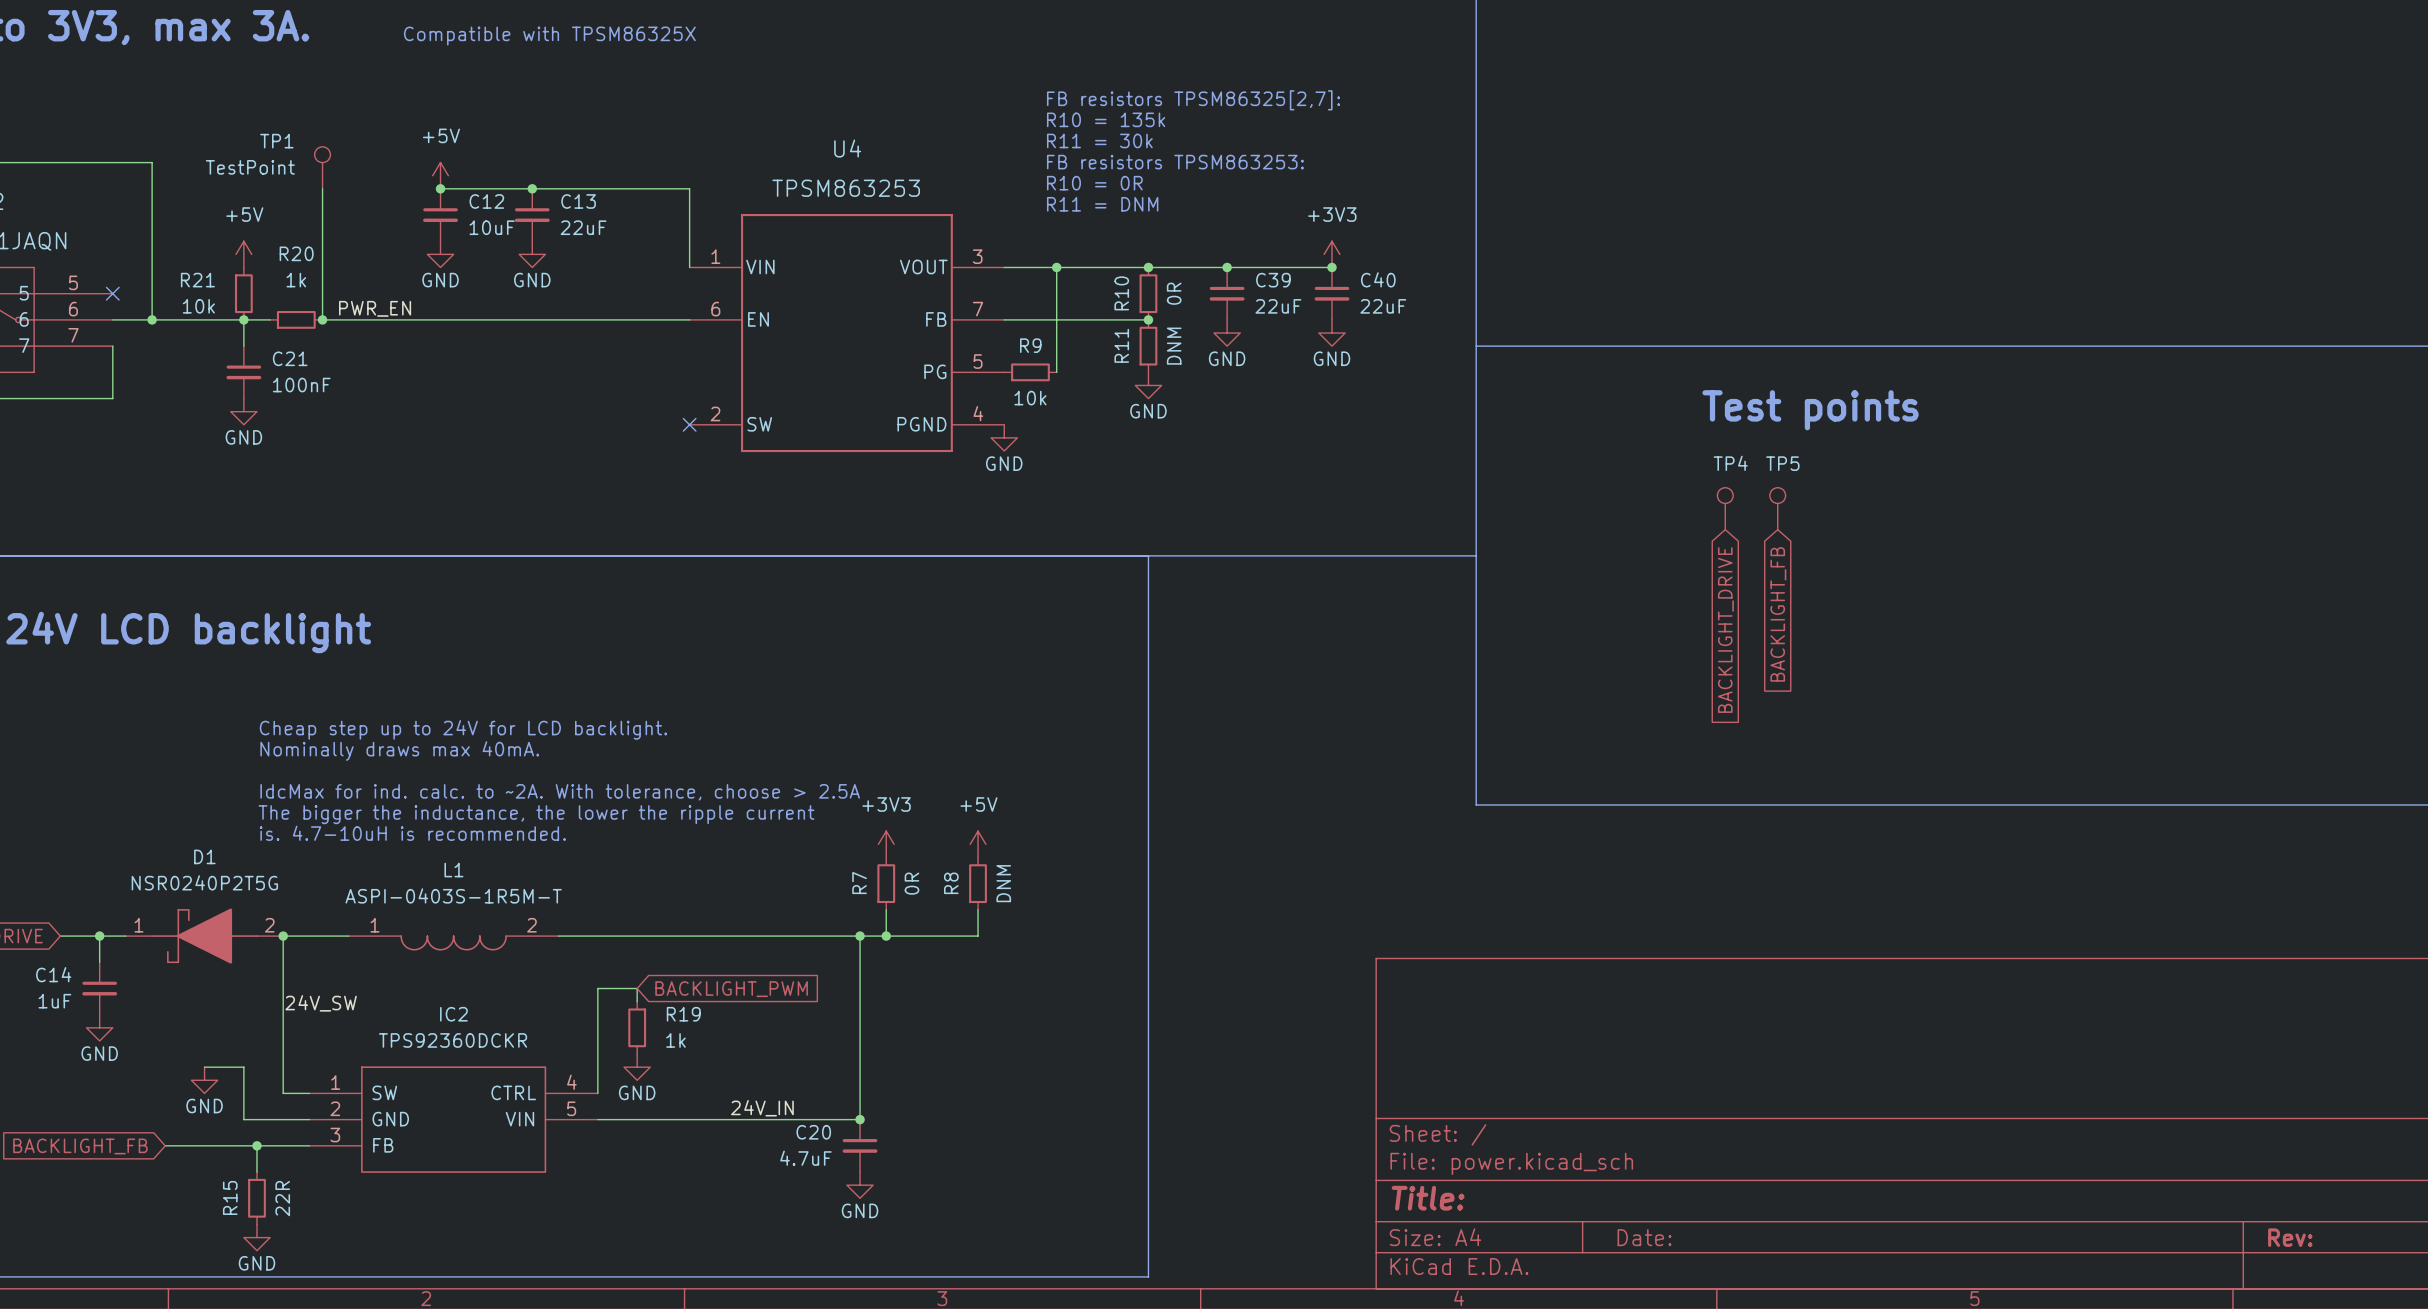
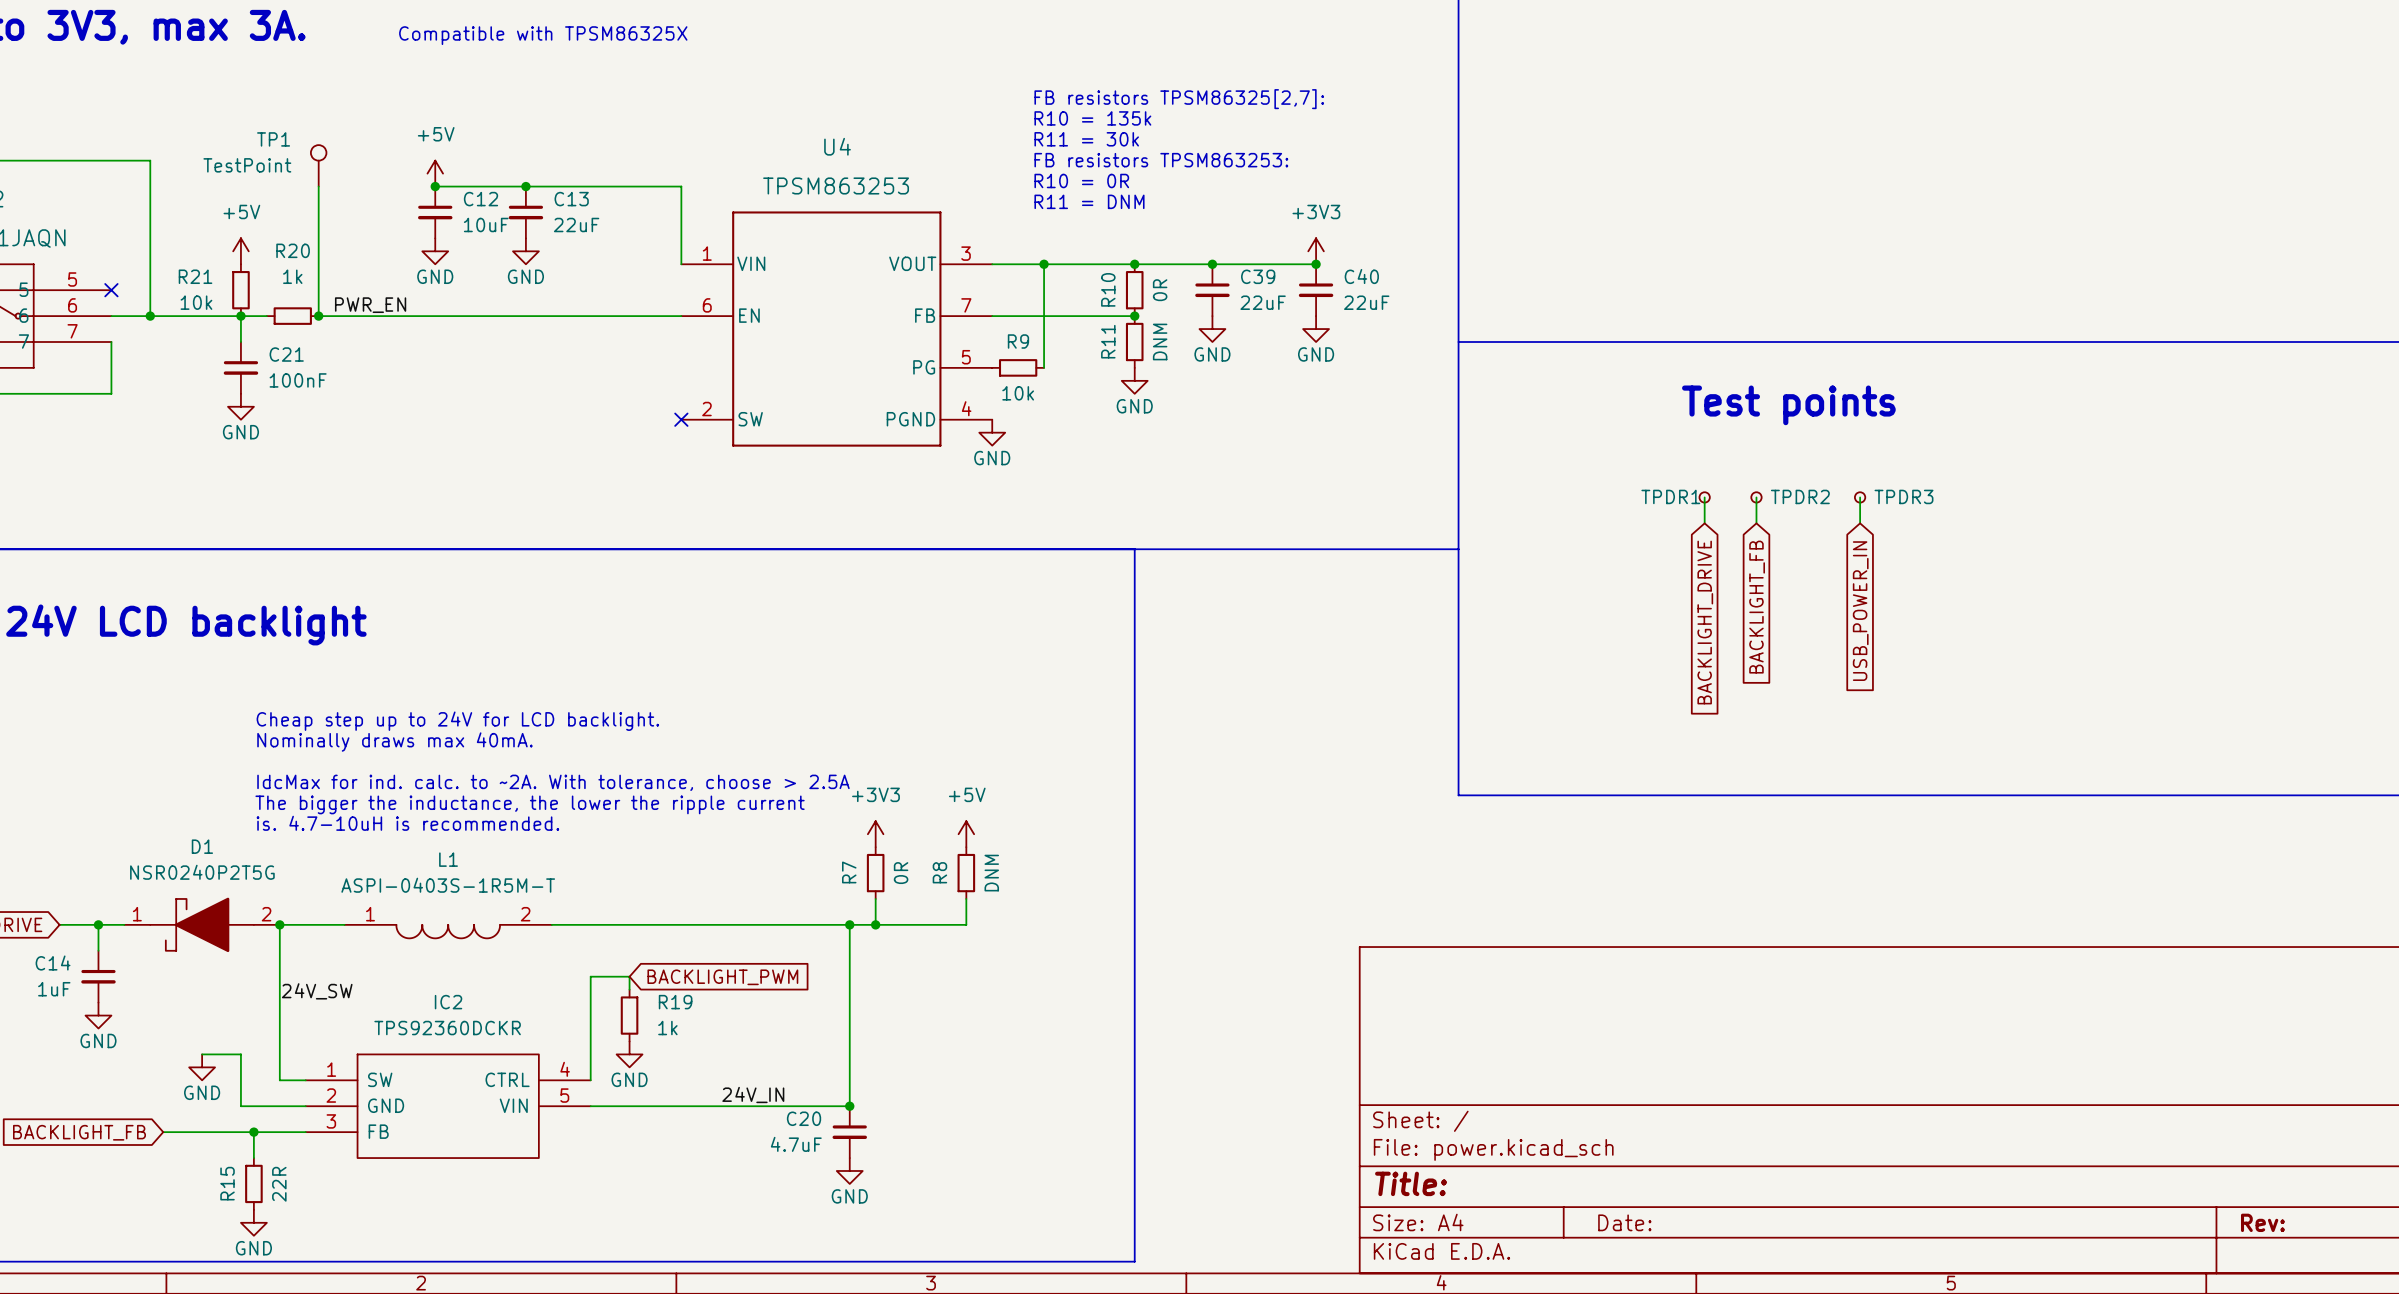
TPDR1: none -> (1704, 497)
TPDR2: none -> (1756, 497)
wire: none -> (1860, 497) (1860, 523)
TPDR3: none -> (1860, 497)
TP4: (1725, 508) -> none
TP5: (1777, 508) -> none
global label: none -> USB_POWER_IN (1860, 611)

